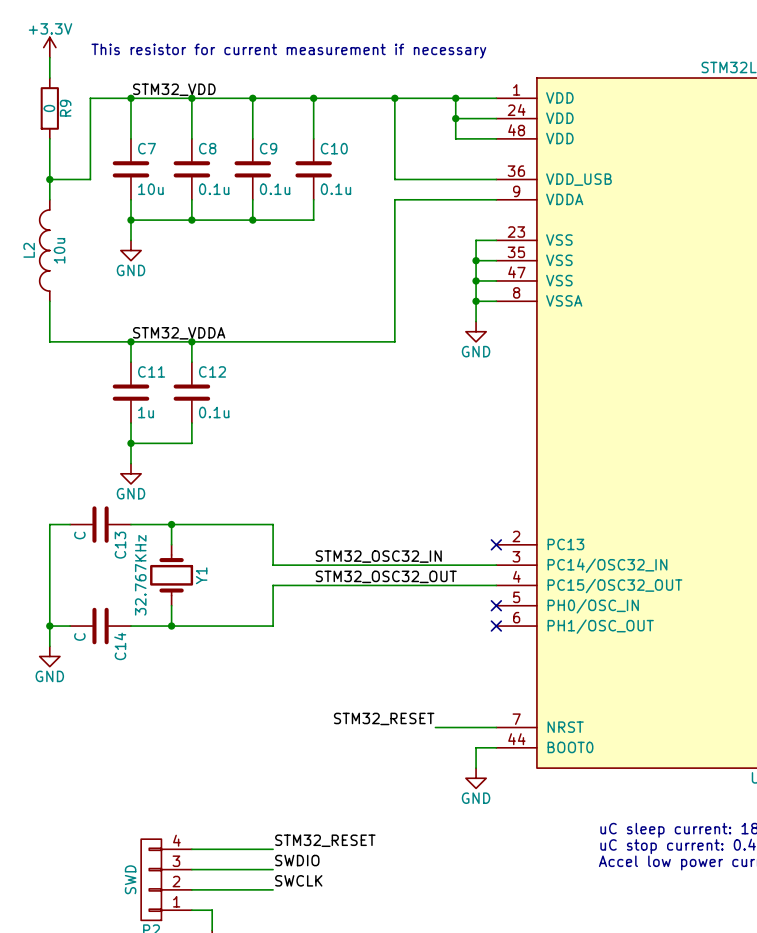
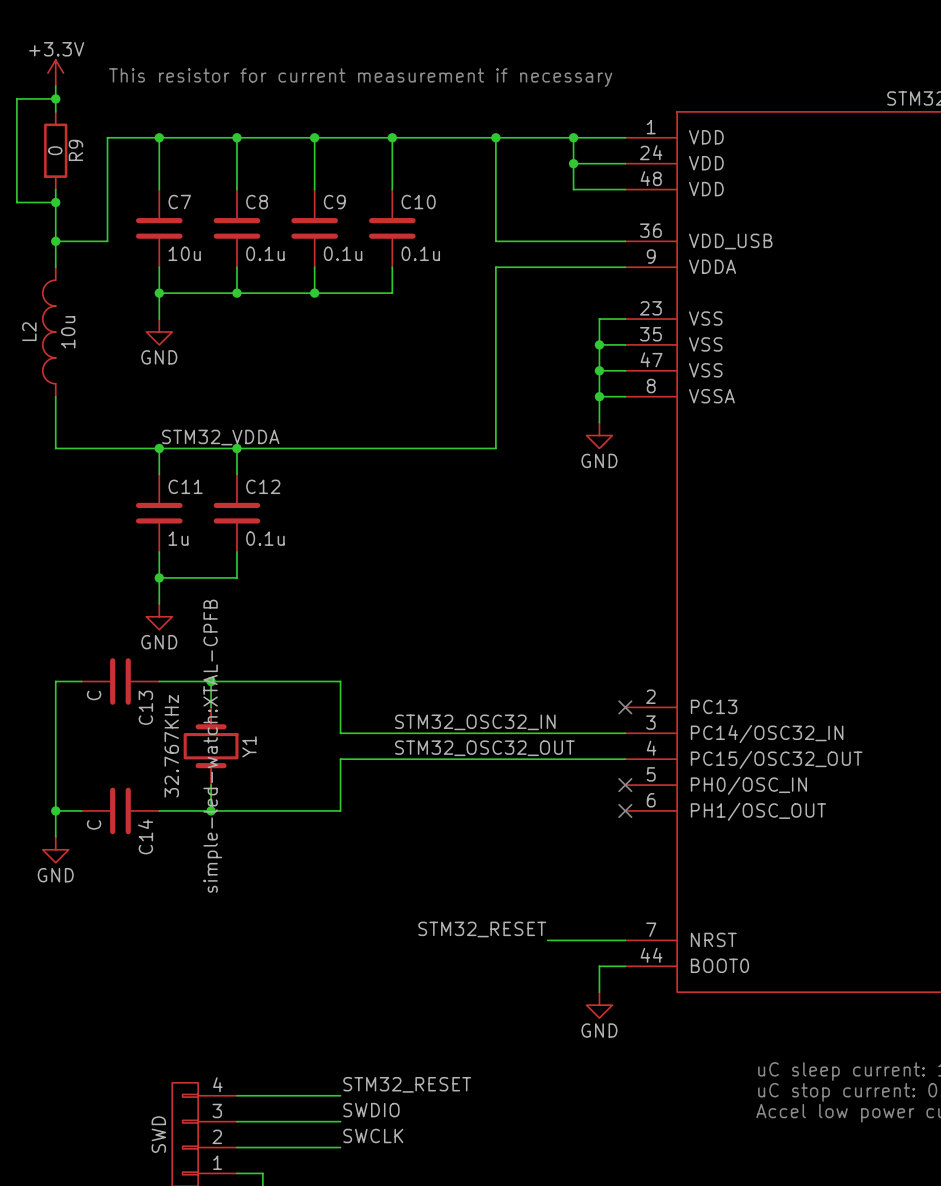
wire: none -> (55, 98) (16, 98) (16, 202) (55, 202)
junction: none -> (55, 98)
label: STM32_VDD (174, 89) -> none
junction: none -> (55, 202)
Y1 text: none -> simple-led-watch:XTAL-CPFB (212, 746)

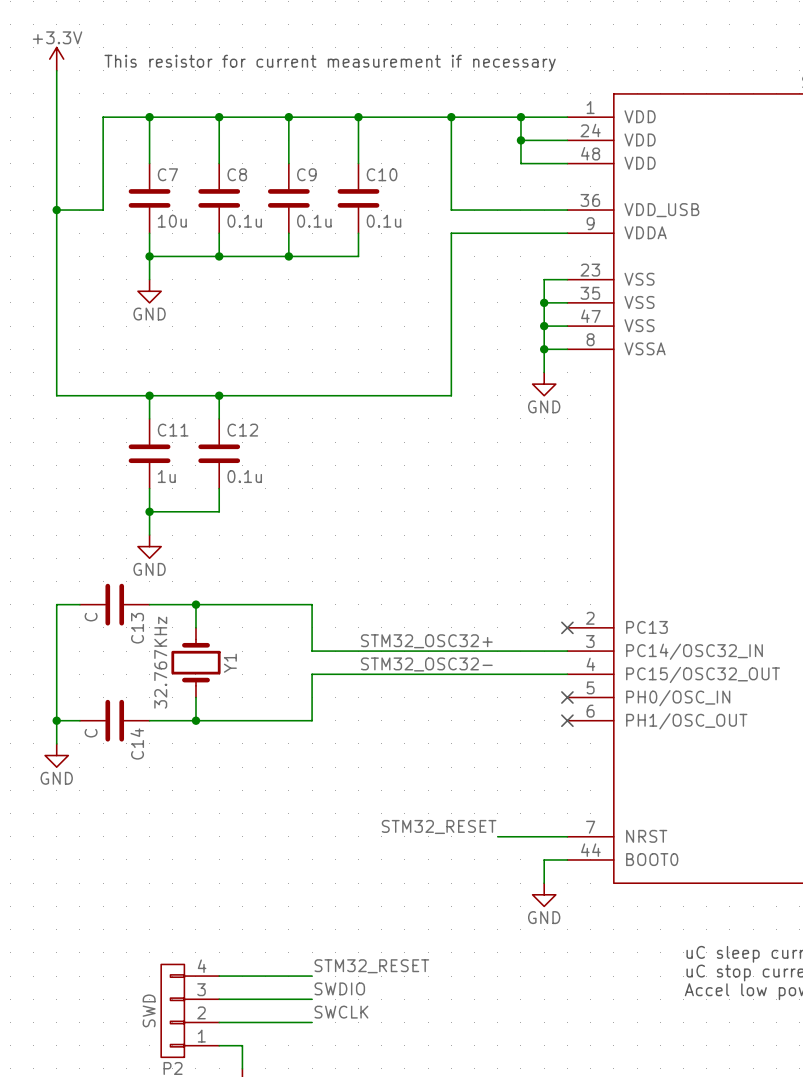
wire: (55, 98) (16, 98) (16, 202) (55, 202) -> none
junction: (55, 98) -> none
wire: none -> (56, 93) (56, 163)
R9: 0 (55, 150) -> none
junction: (55, 202) -> none
wire: none -> (56, 233) (56, 349)
L2: 10u (49, 331) -> none
label: STM32_VDDA (220, 437) -> none
label: STM32_OSC32_IN (475, 722) -> STM32_OSC32+ (426, 641)
Y1 text: simple-led-watch:XTAL-CPFB (212, 746) -> none
label: STM32_OSC32_OUT (484, 748) -> STM32_OSC32- (426, 664)

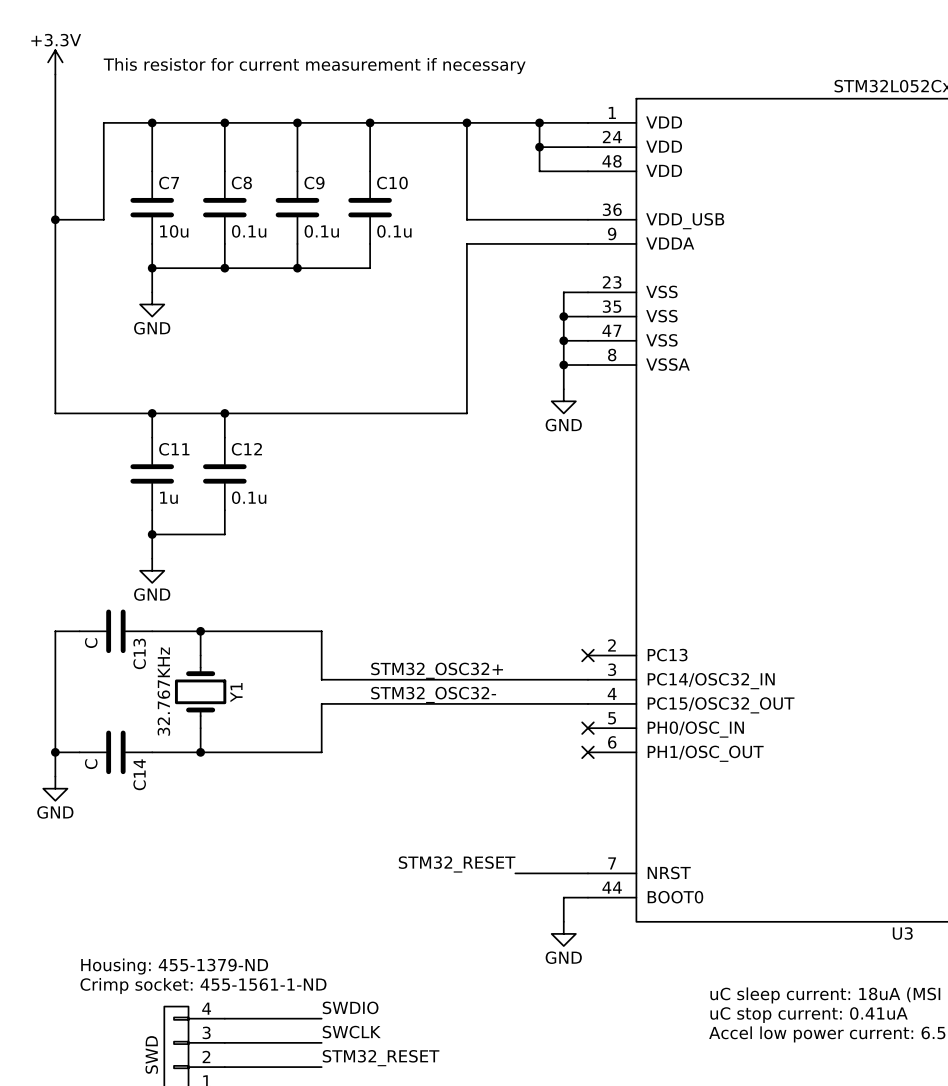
text: none -> Housing: 455-1379-ND (174, 966)
text: none -> Crimp socket: 455-1561-1-ND (203, 986)
label: STM32_RESET (371, 966) -> SWDIO (350, 1007)
label: SWDIO (339, 988) -> SWCLK (351, 1032)
label: SWCLK (341, 1012) -> STM32_RESET (381, 1058)

